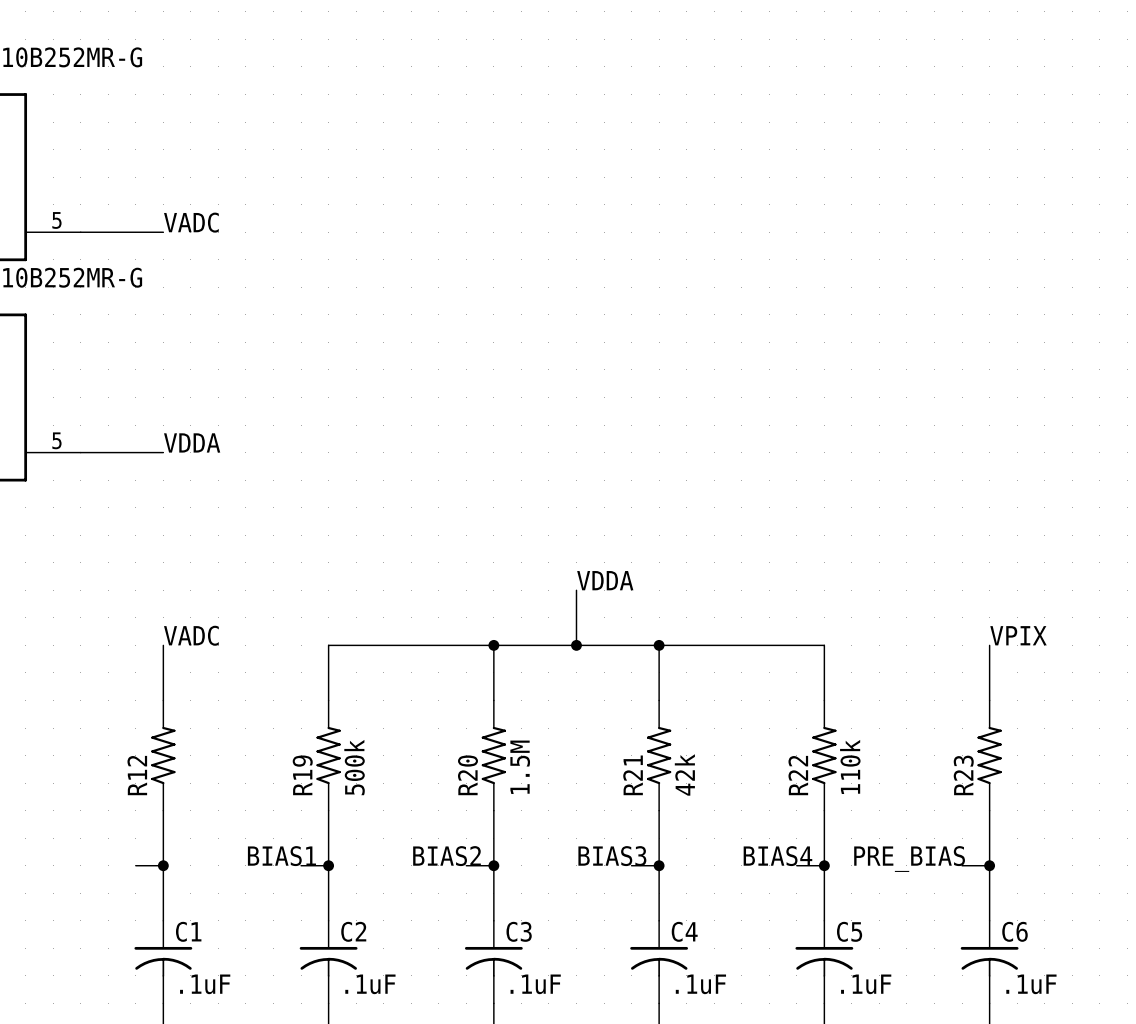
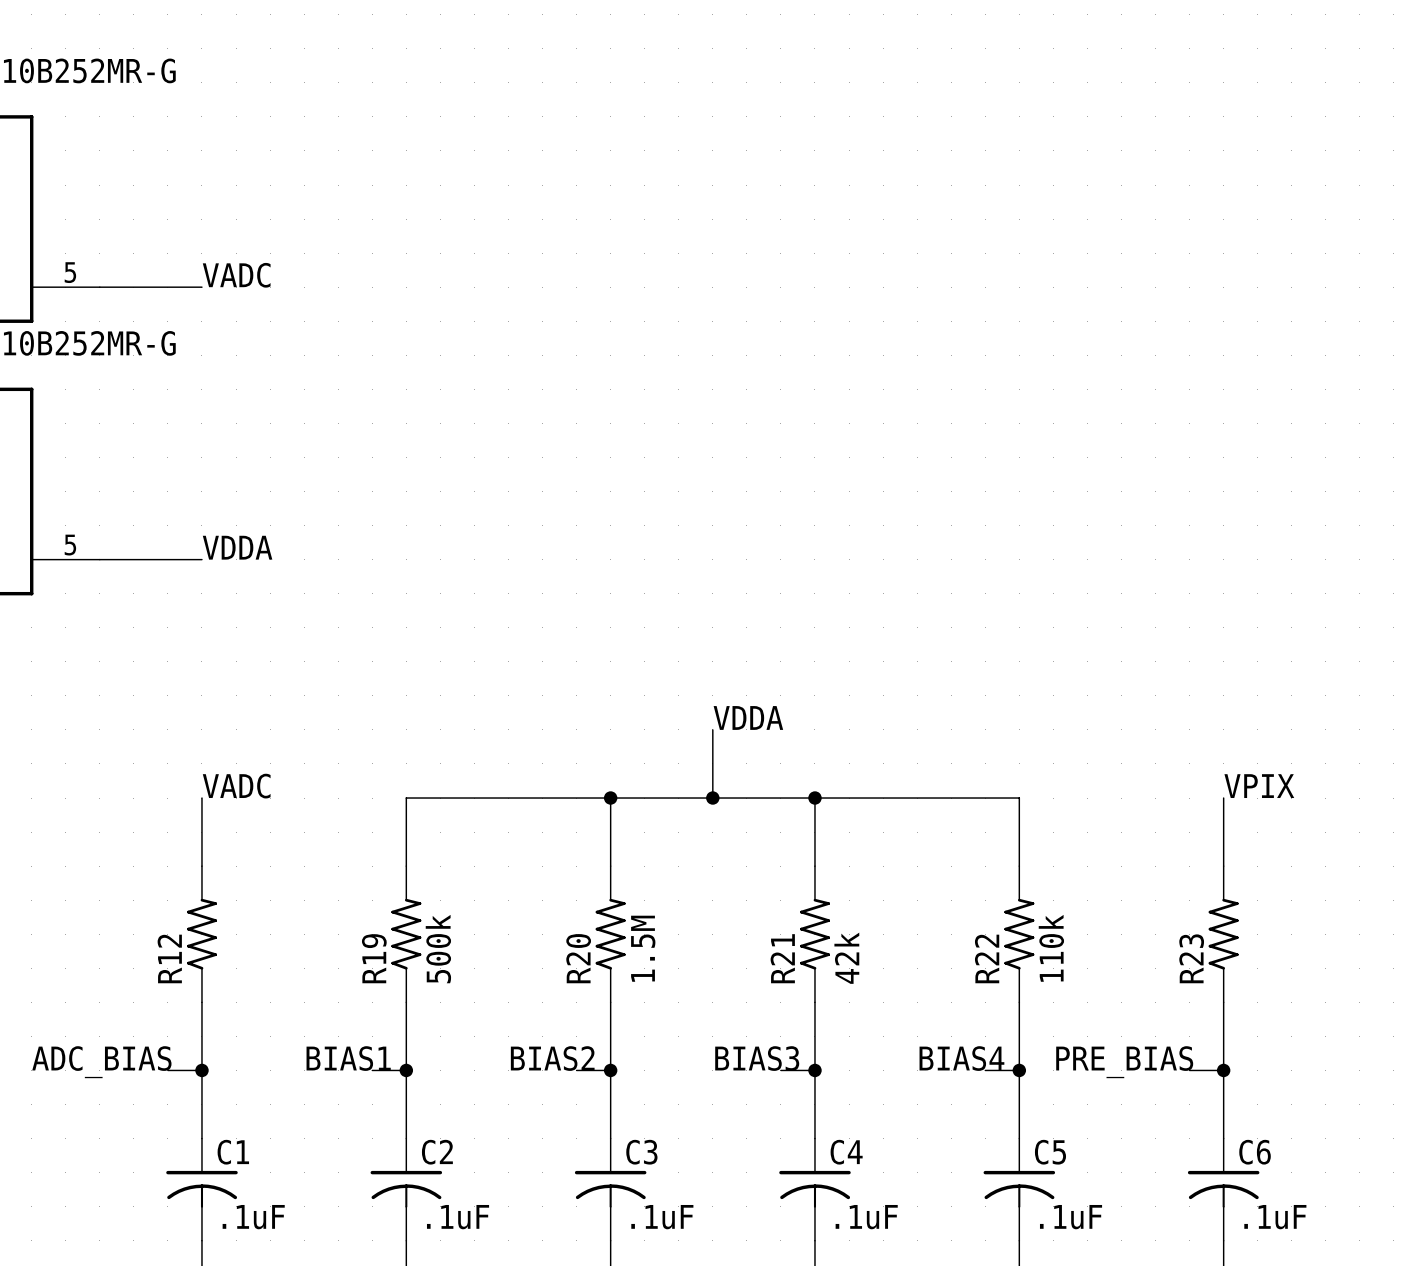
label: none -> ADC_BIAS (101, 1062)

